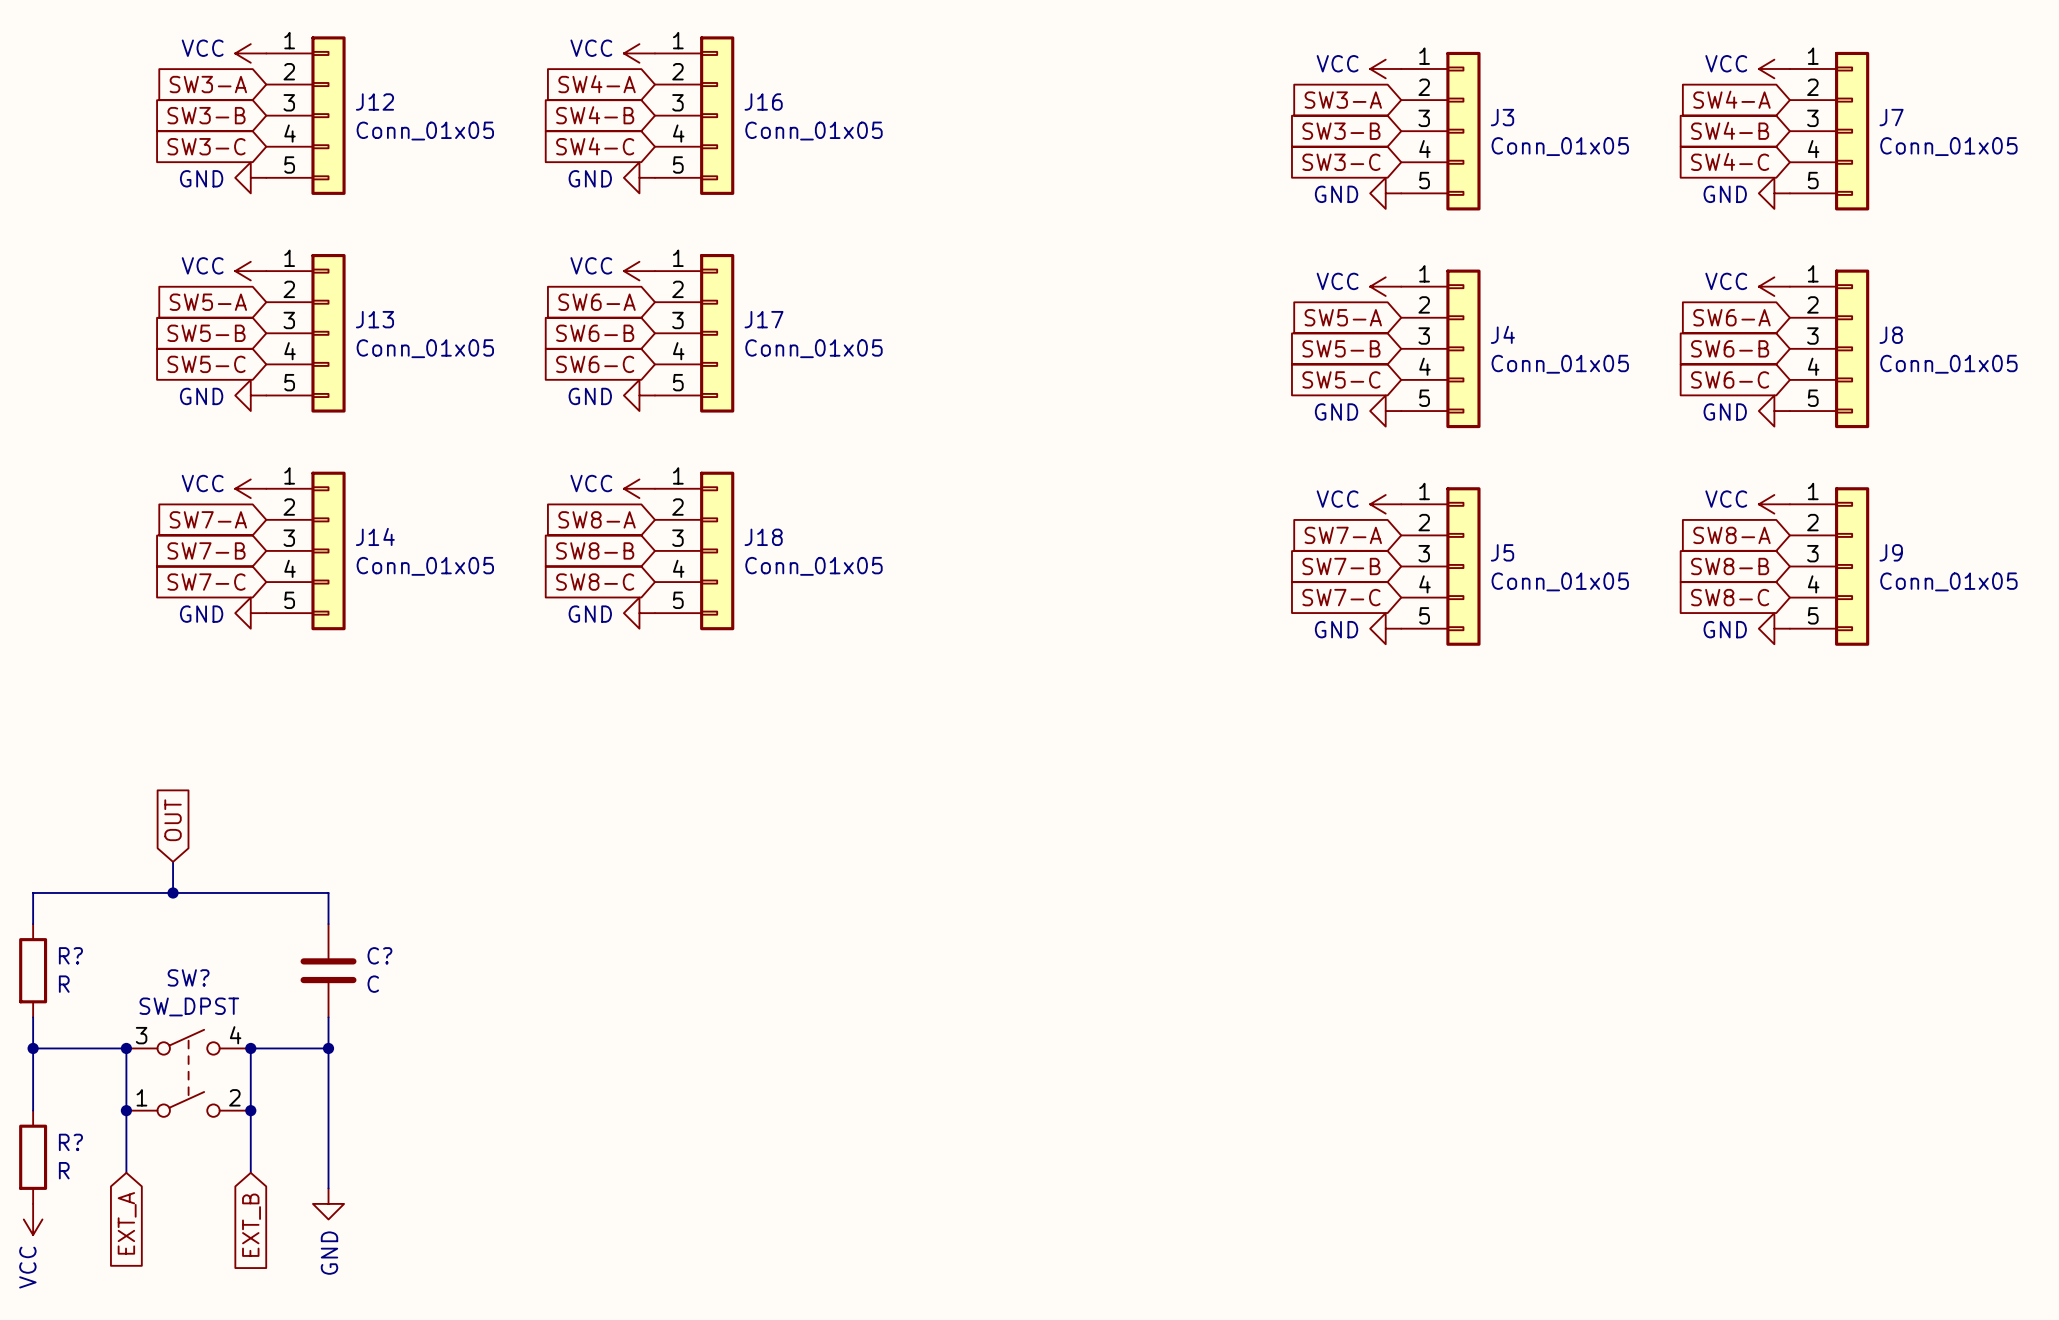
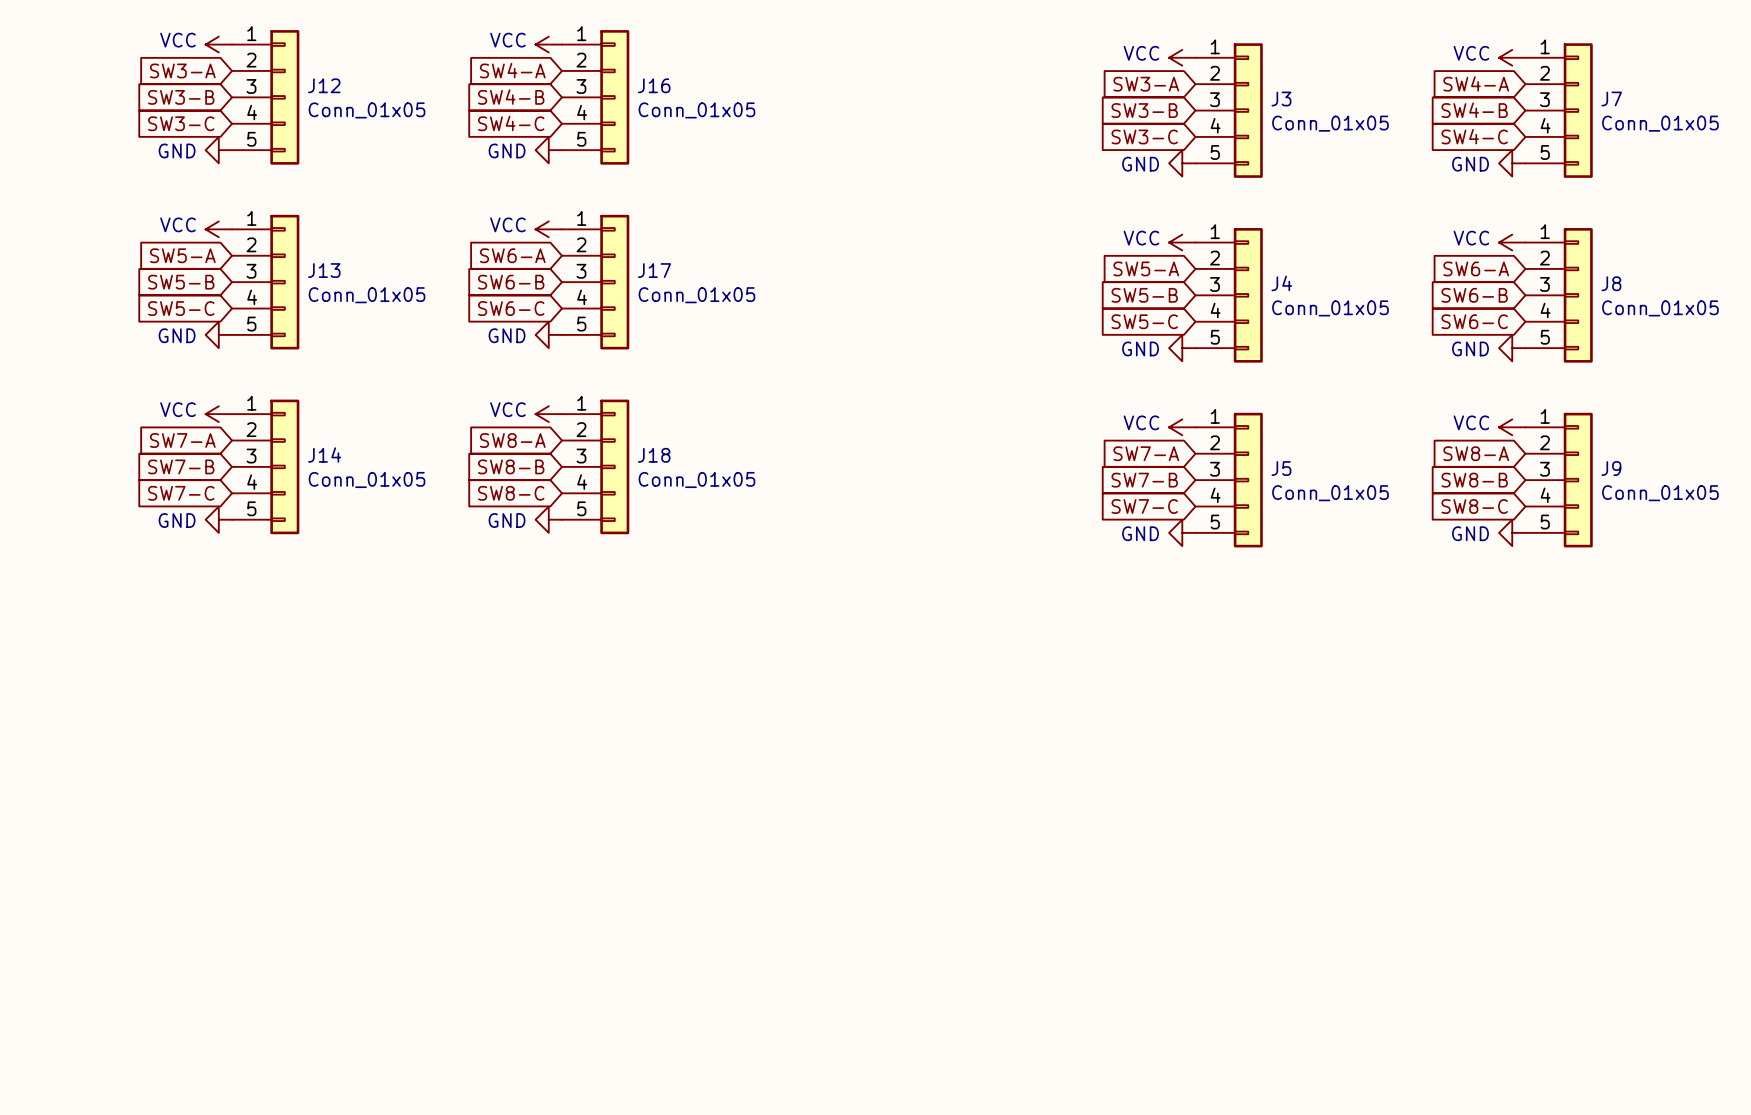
global label: OUT (173, 820) -> none
wire: (173, 861) (173, 892) -> none
junction: (173, 892) -> none
wire: (33, 924) (33, 892) (328, 892) (328, 924) -> none
R?: R (33, 970) -> none
C?: C (328, 970) -> none
wire: (33, 1017) (33, 1110) -> none
wire: (328, 1017) (328, 1188) -> none
wire: (33, 1048) (126, 1048) (126, 1172) -> none
junction: (33, 1048) -> none
junction: (126, 1048) -> none
junction: (250, 1048) -> none
wire: (328, 1048) (250, 1048) (250, 1172) -> none
junction: (328, 1048) -> none
SW?: SW_DPST (188, 1073) -> none
junction: (126, 1110) -> none
junction: (250, 1110) -> none
R?: R (33, 1157) -> none
power symbol: GND (328, 1203) -> none
power symbol: VCC (33, 1219) -> none
global label: EXT_A (127, 1223) -> none
global label: EXT_B (251, 1225) -> none

